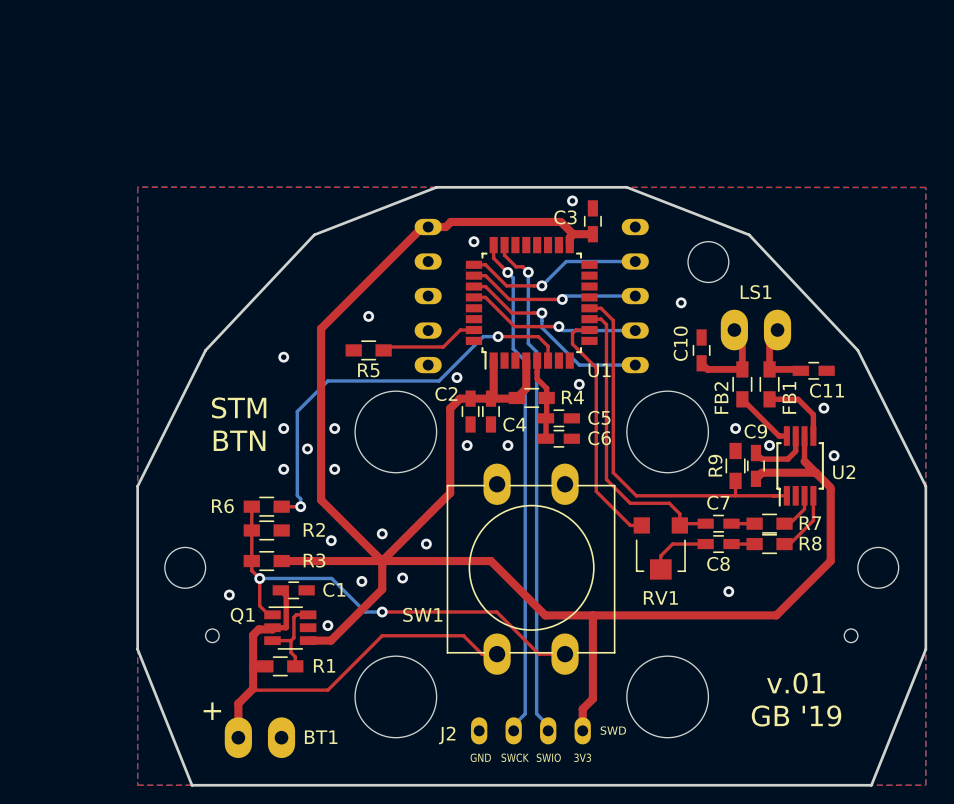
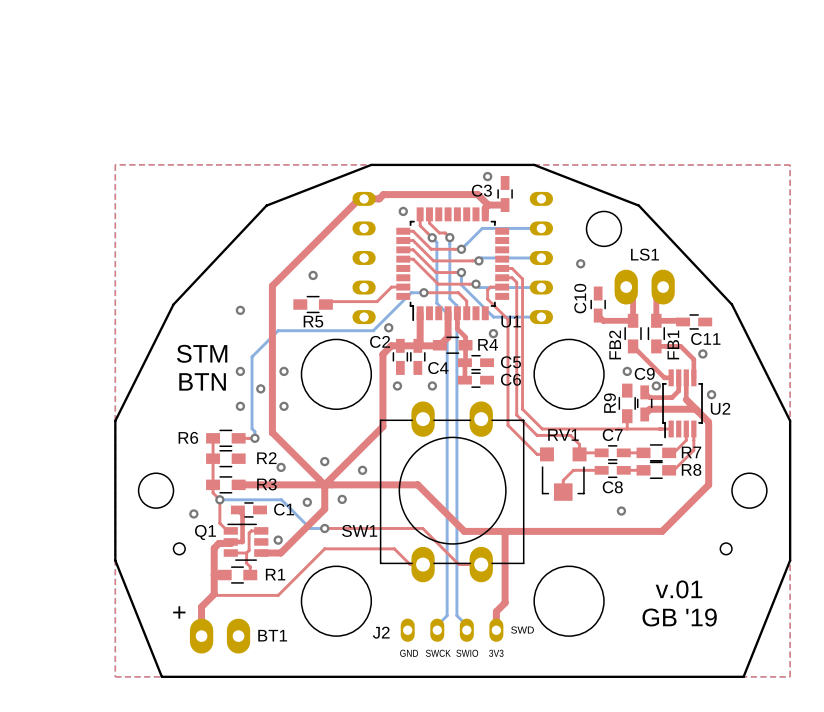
RV1 name position: RV1 (660, 597) -> RV1 (563, 434)

